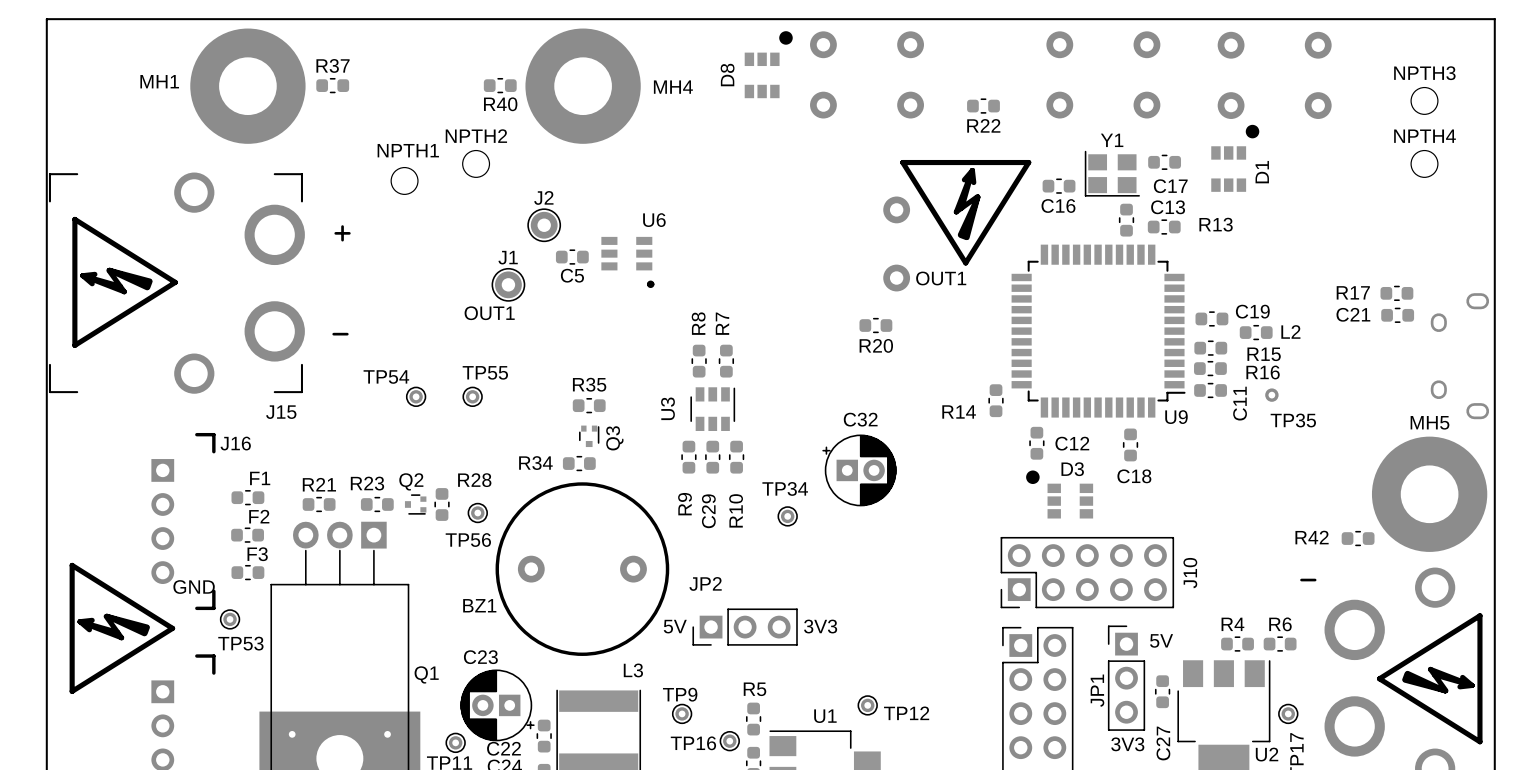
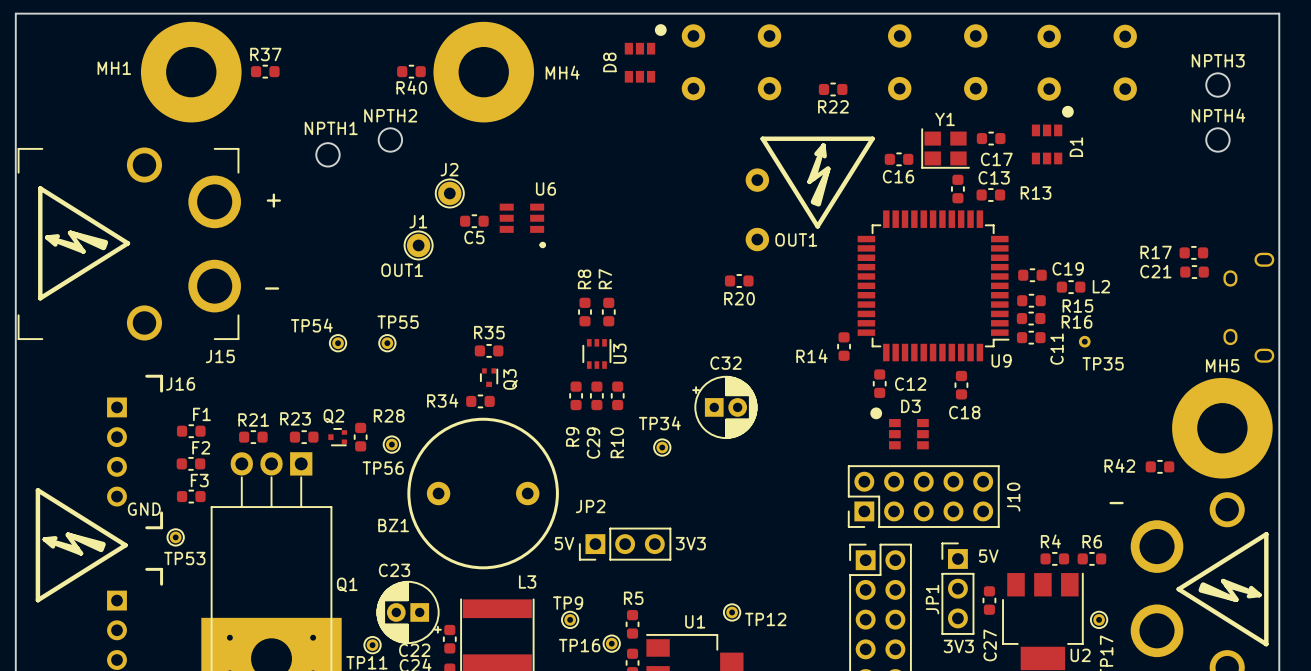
U3 footprint: [690, 387, 736, 431] -> [582, 339, 612, 369]
U3 name position: U3 (667, 408) -> U3 (619, 353)

